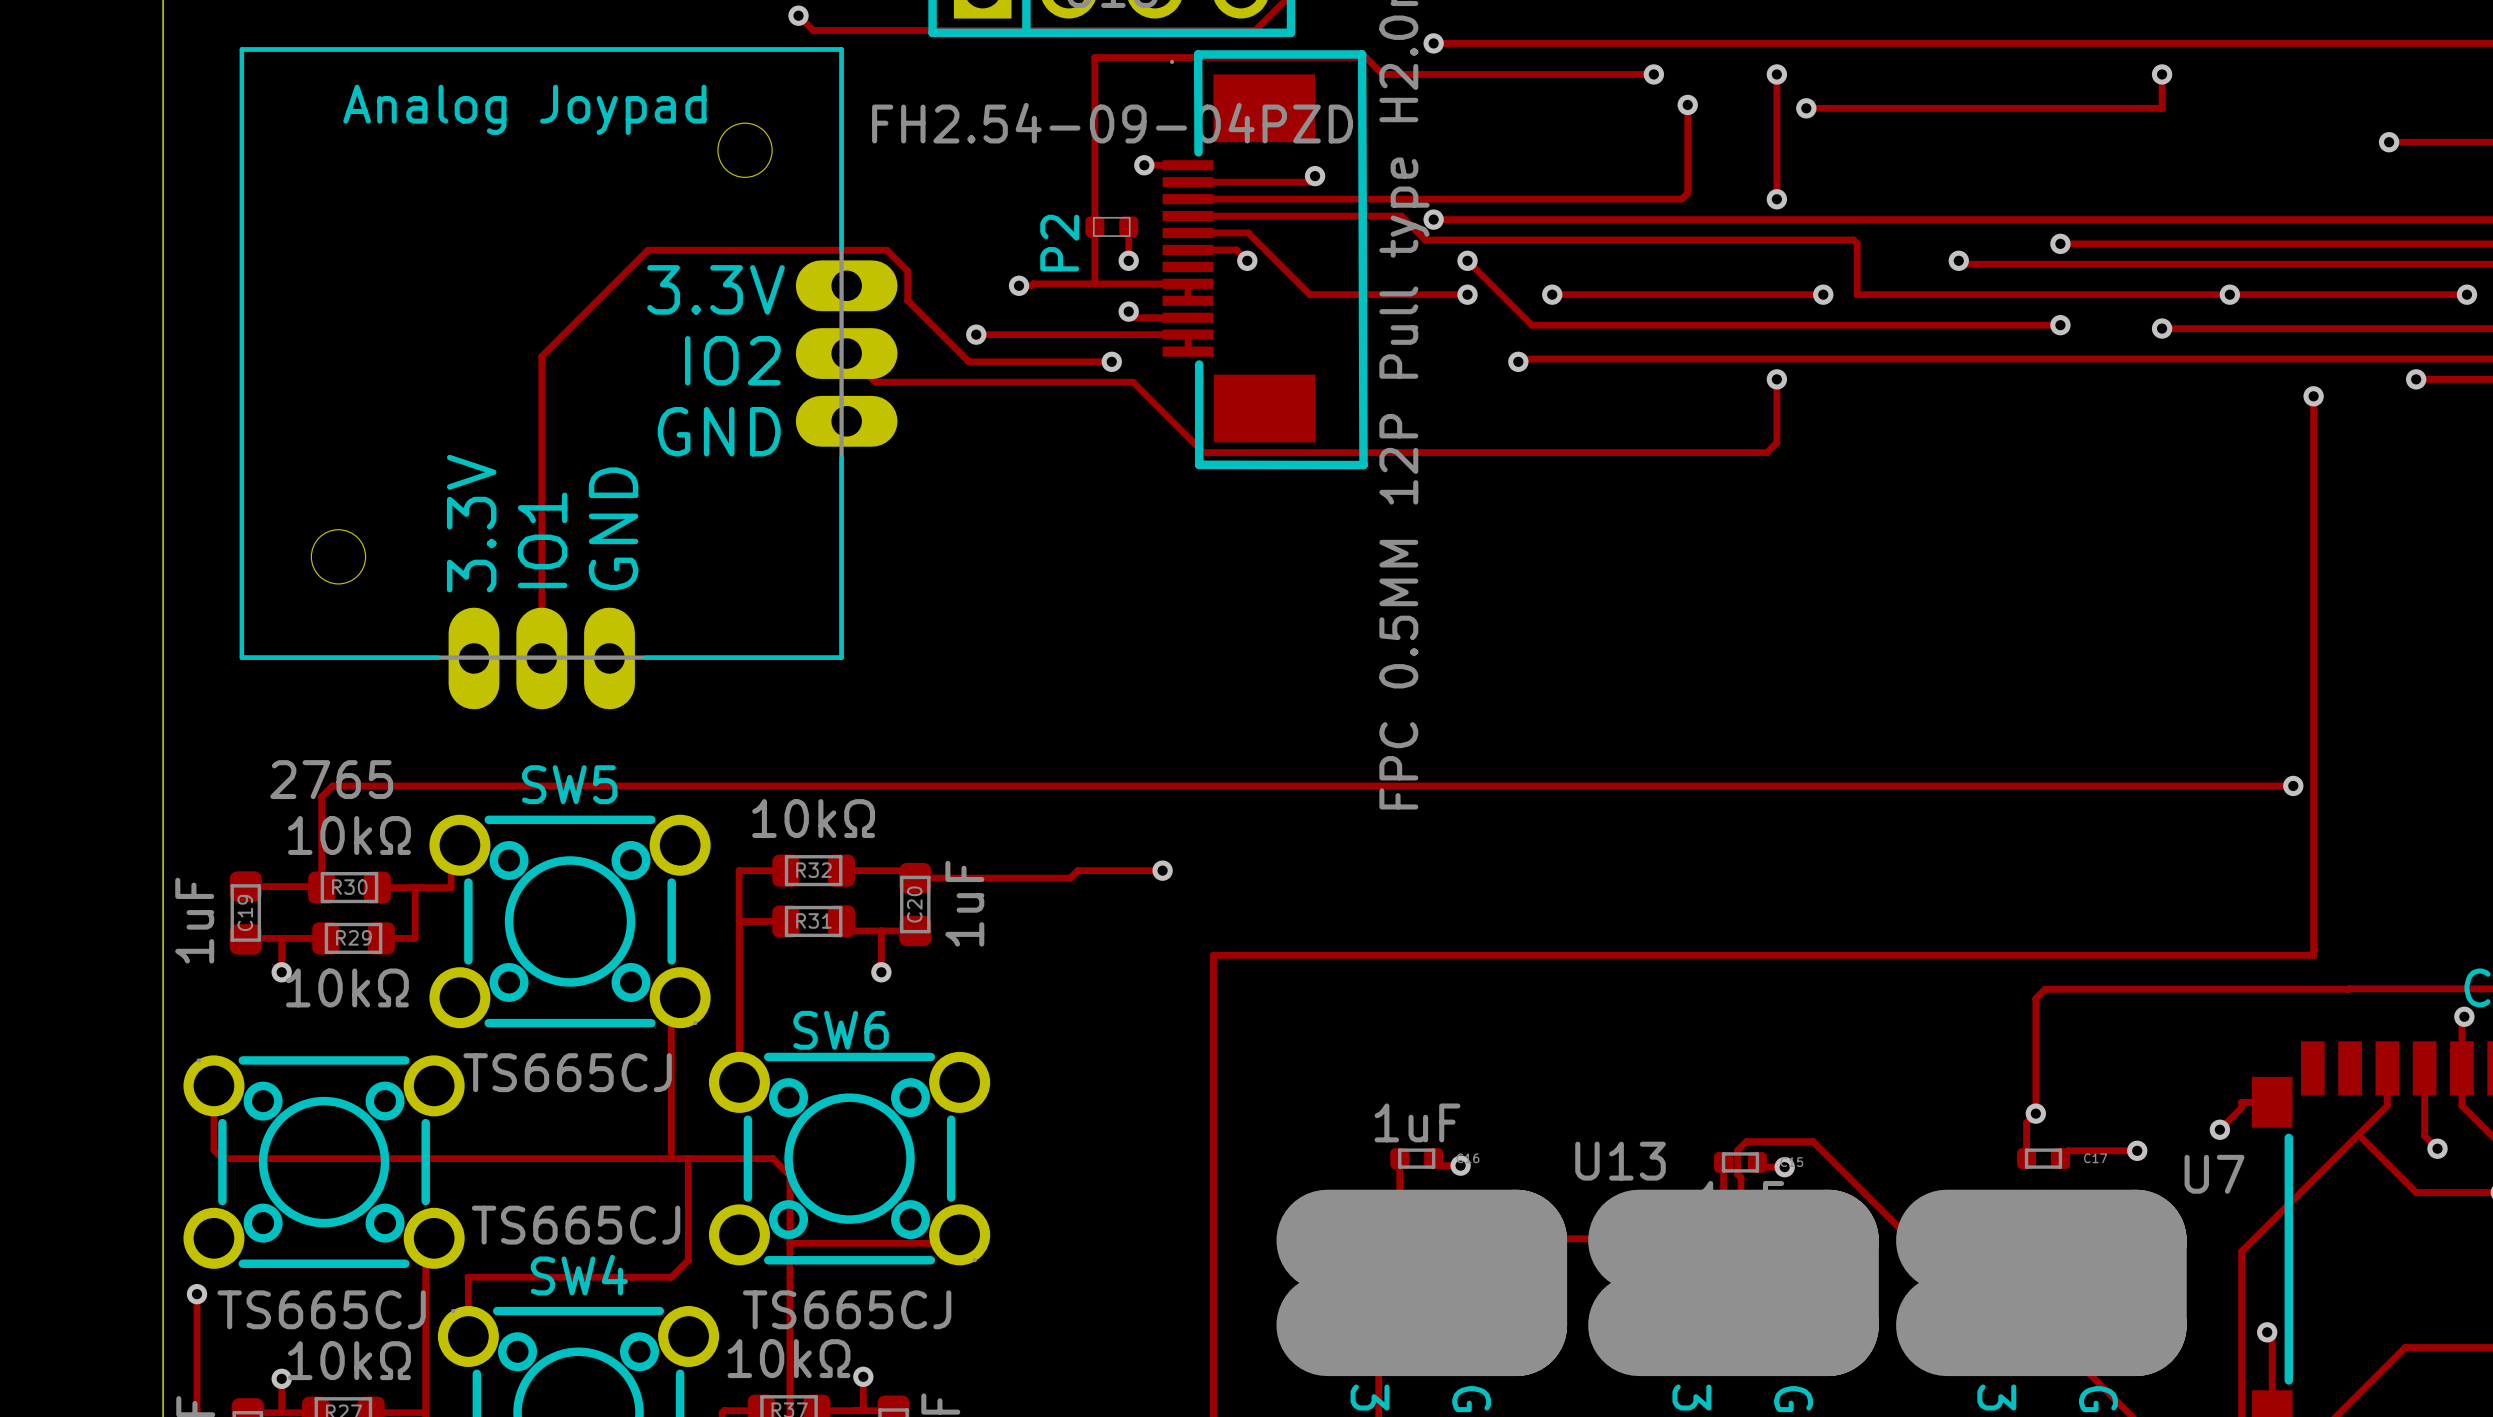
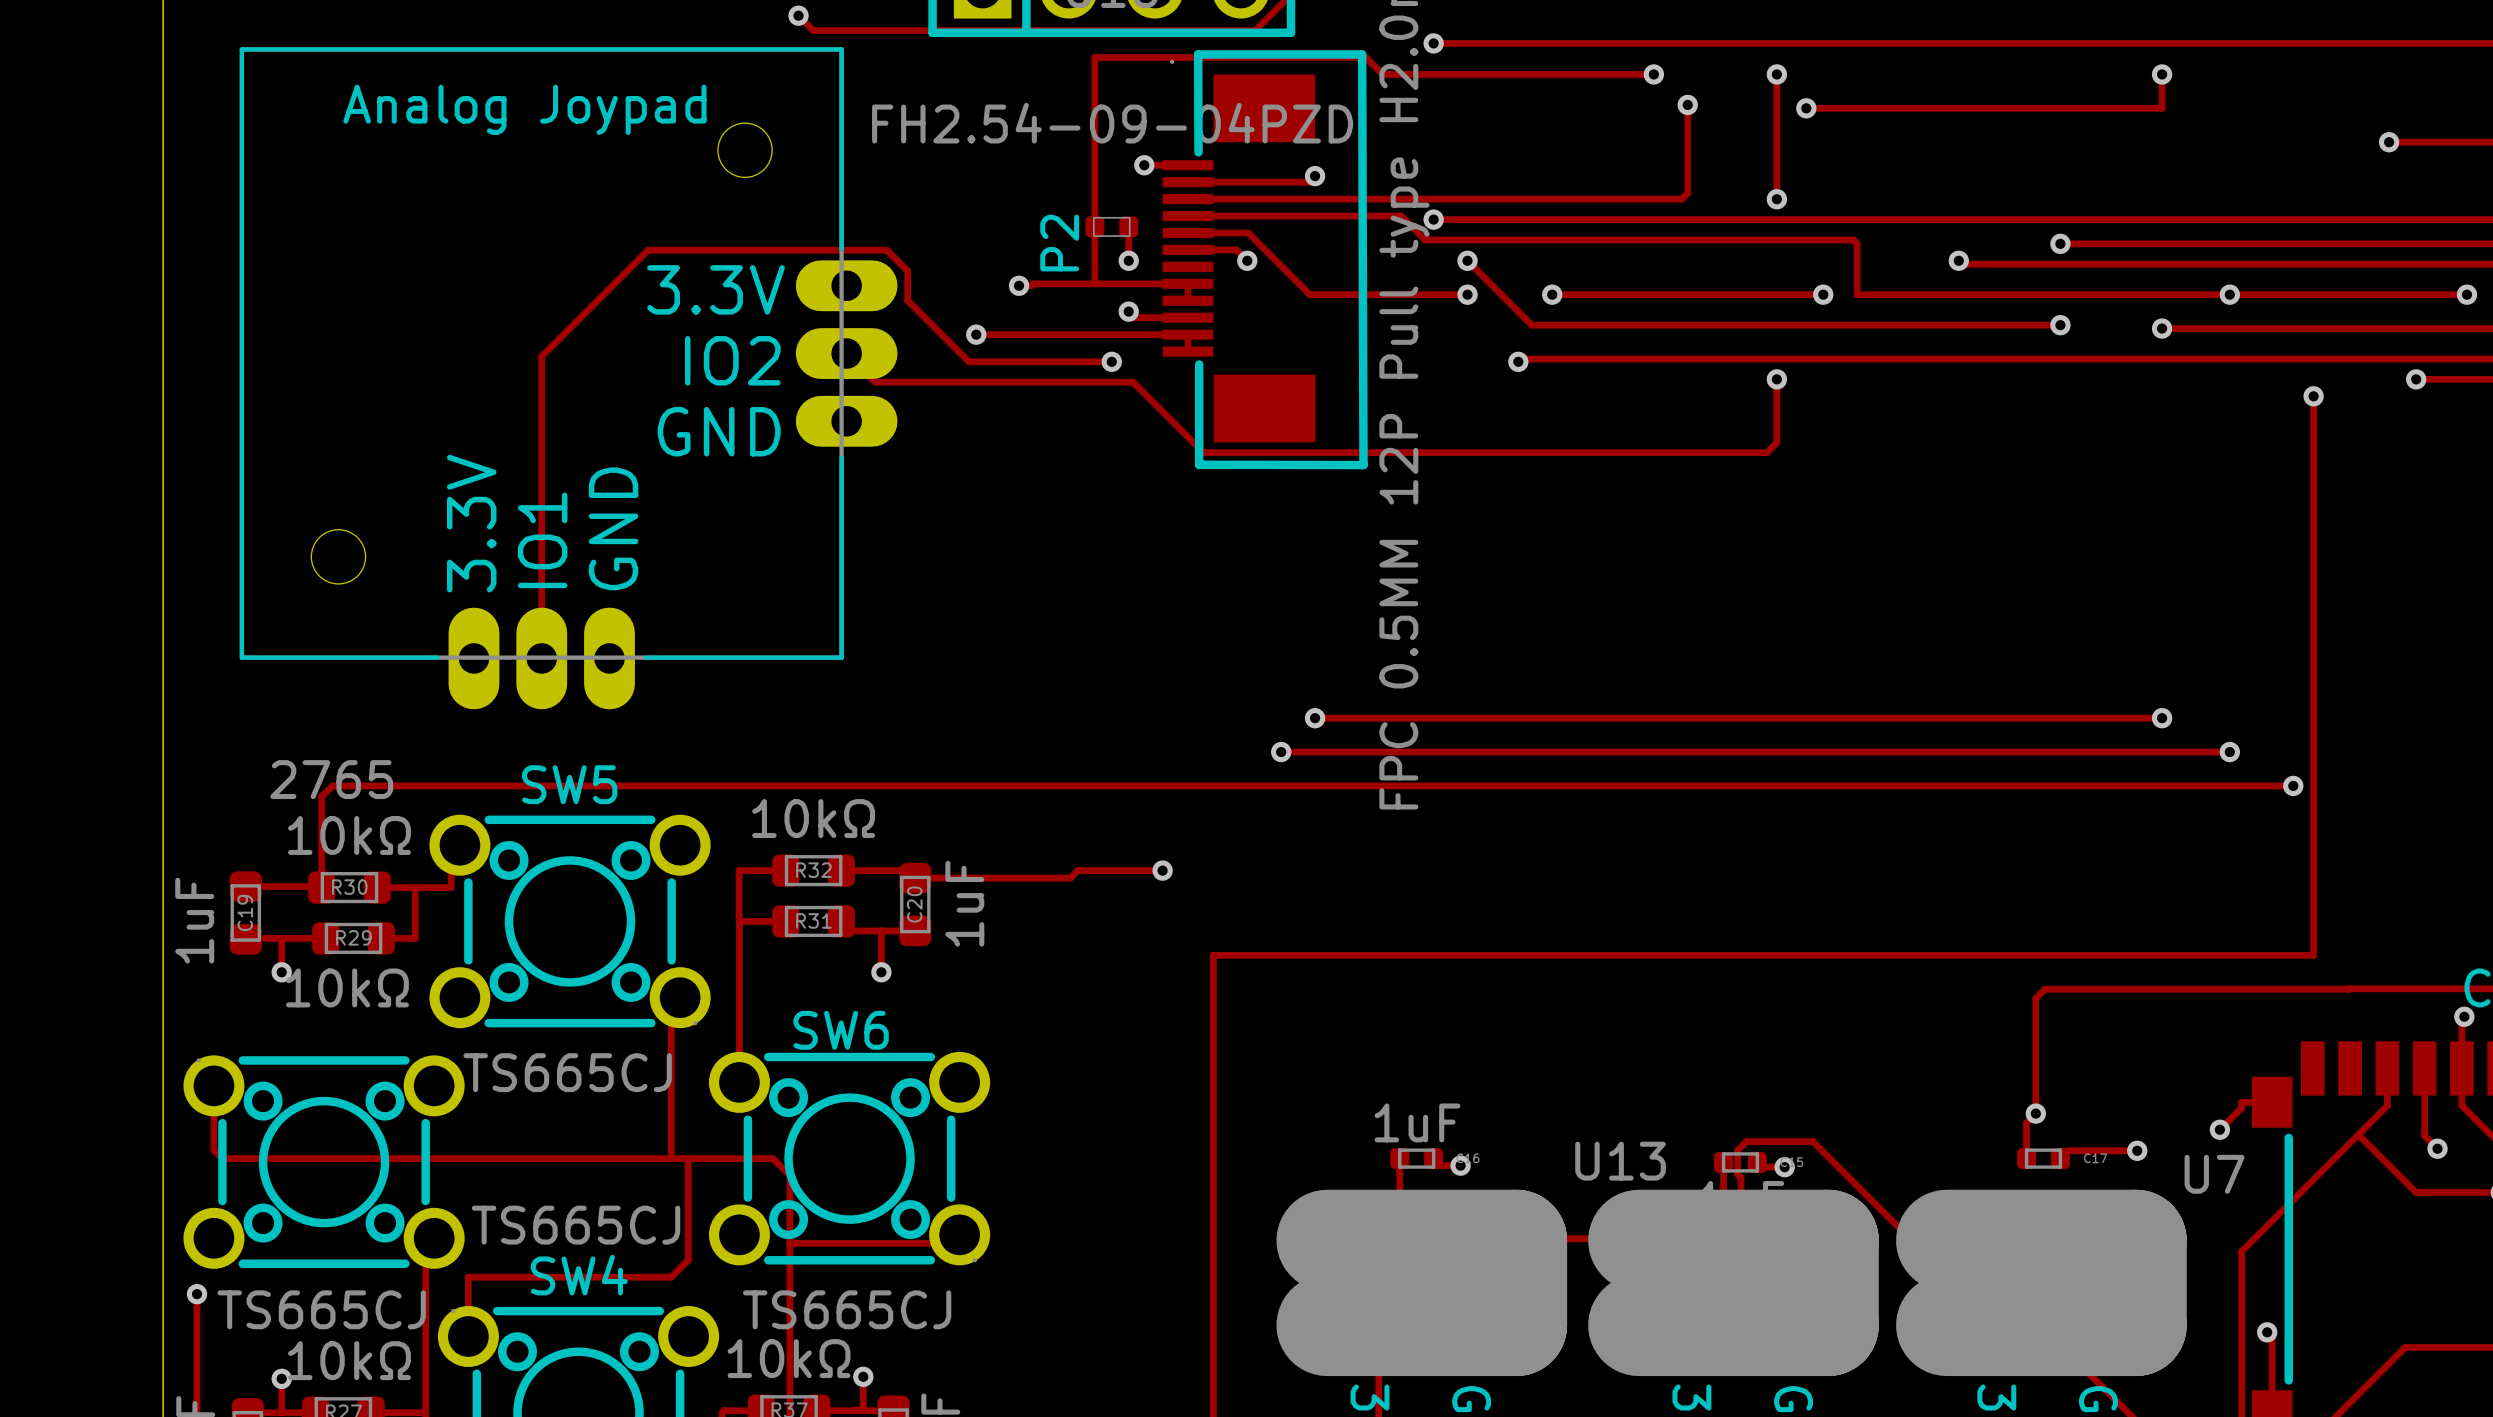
track: none -> (1315, 718) (2162, 718)
via: none -> (1315, 718)
via: none -> (2162, 718)
track: none -> (1281, 752) (2229, 752)
via: none -> (1281, 752)
via: none -> (2229, 752)

